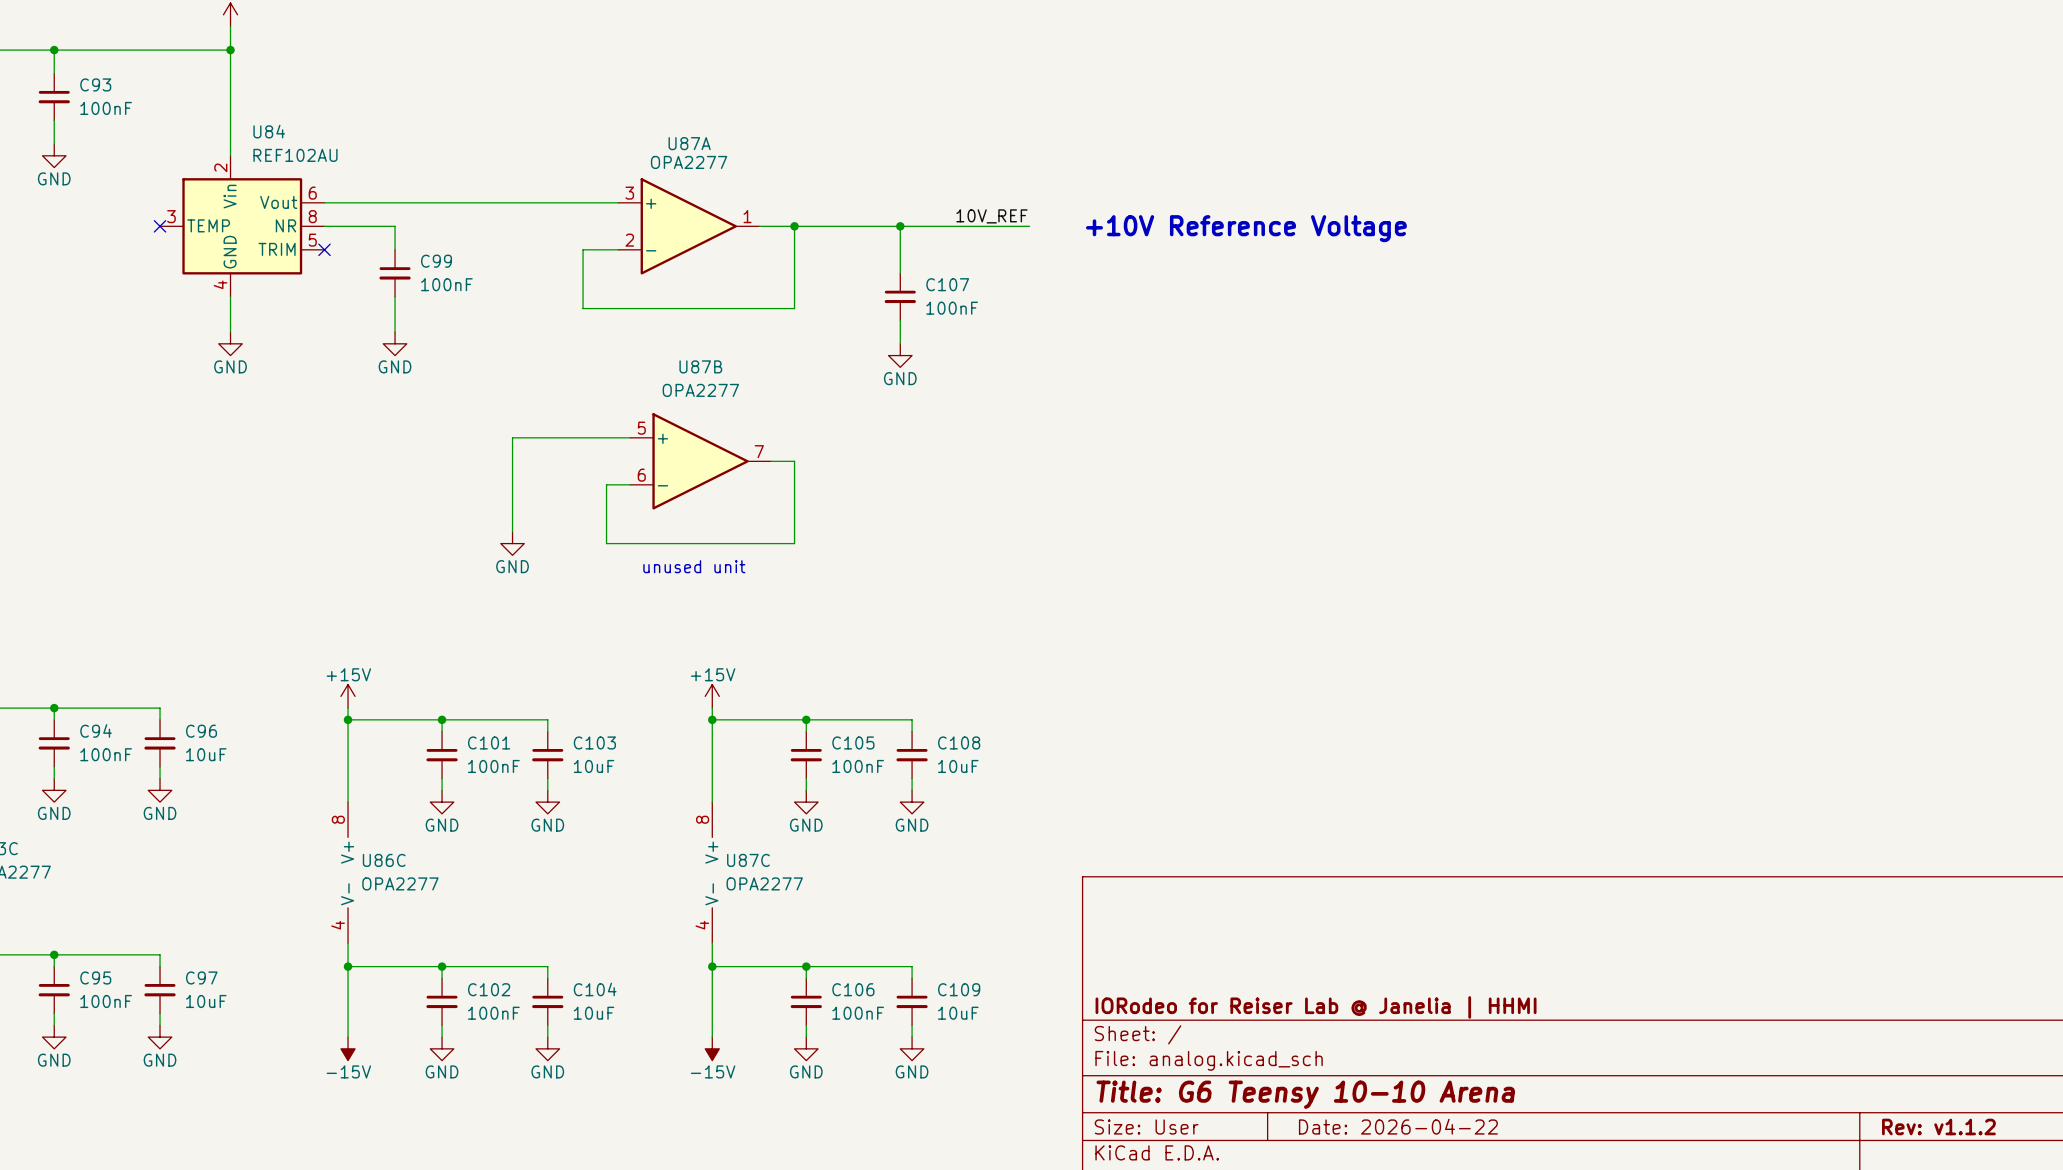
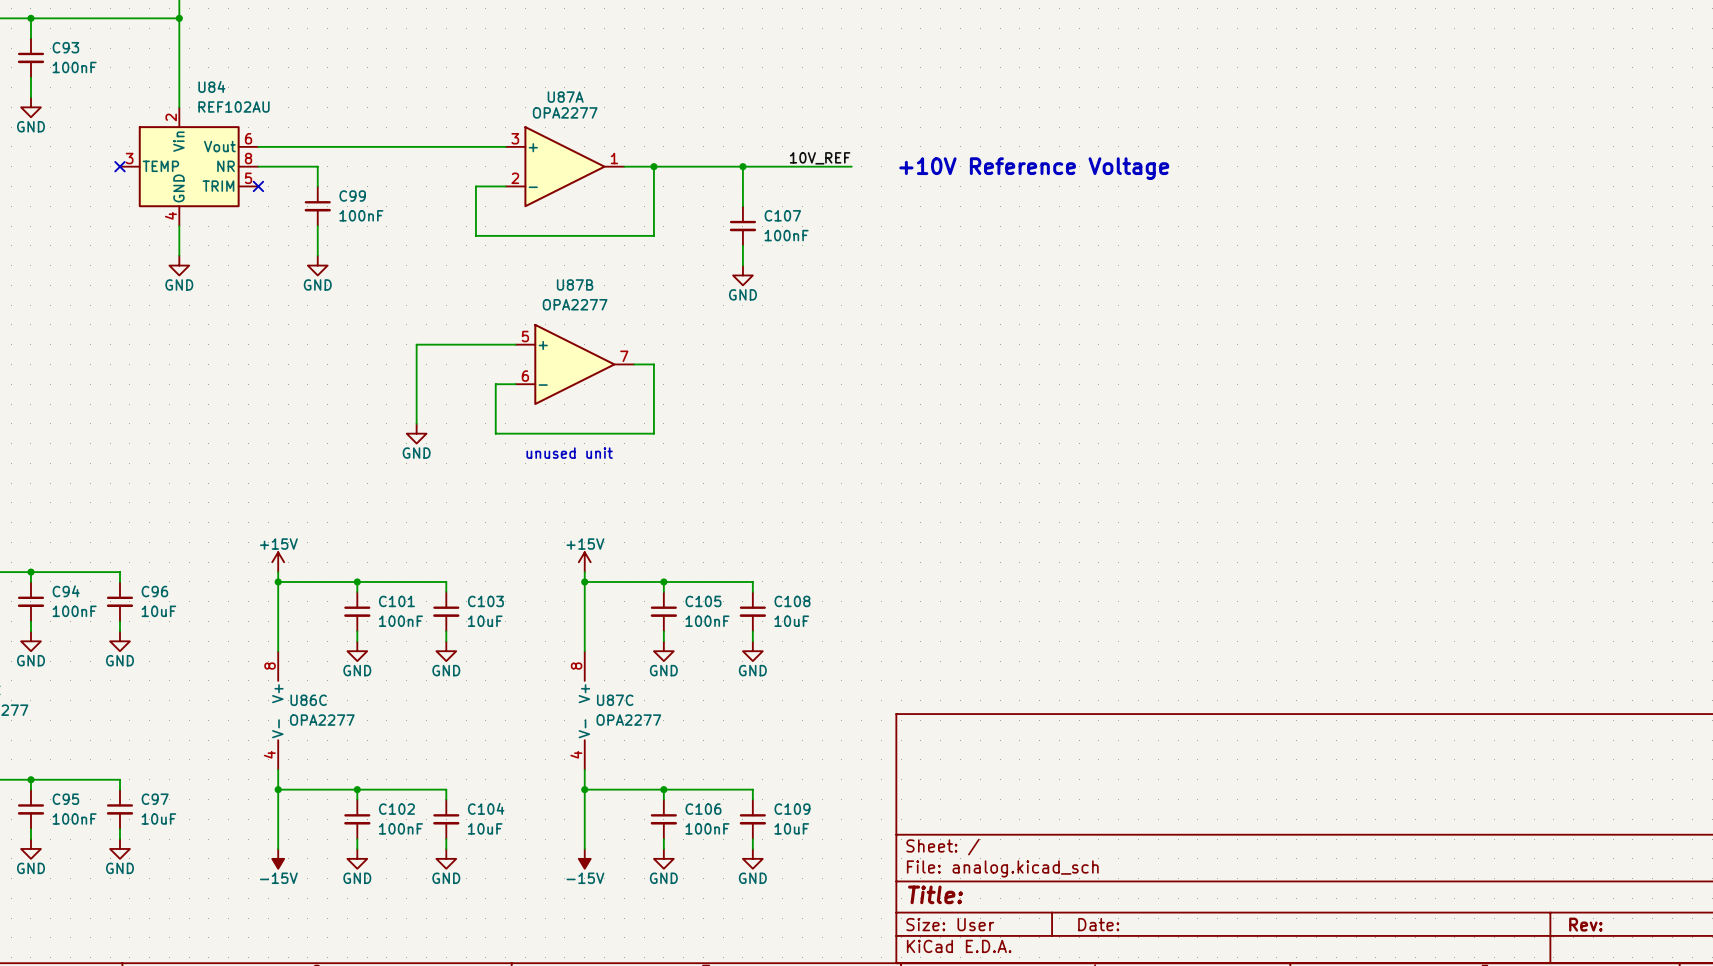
title block: IORodeo for Reiser Lab @ Janelia | HHMI (1316, 1007) -> none
title block: Title: G6 Teensy 10-10 Arena (1305, 1094) -> Title: (935, 894)
title block: Date: 2026-04-22 (1398, 1126) -> Date: (1098, 924)
title block: Rev: v1.1.2 (1938, 1126) -> Rev: (1585, 924)

